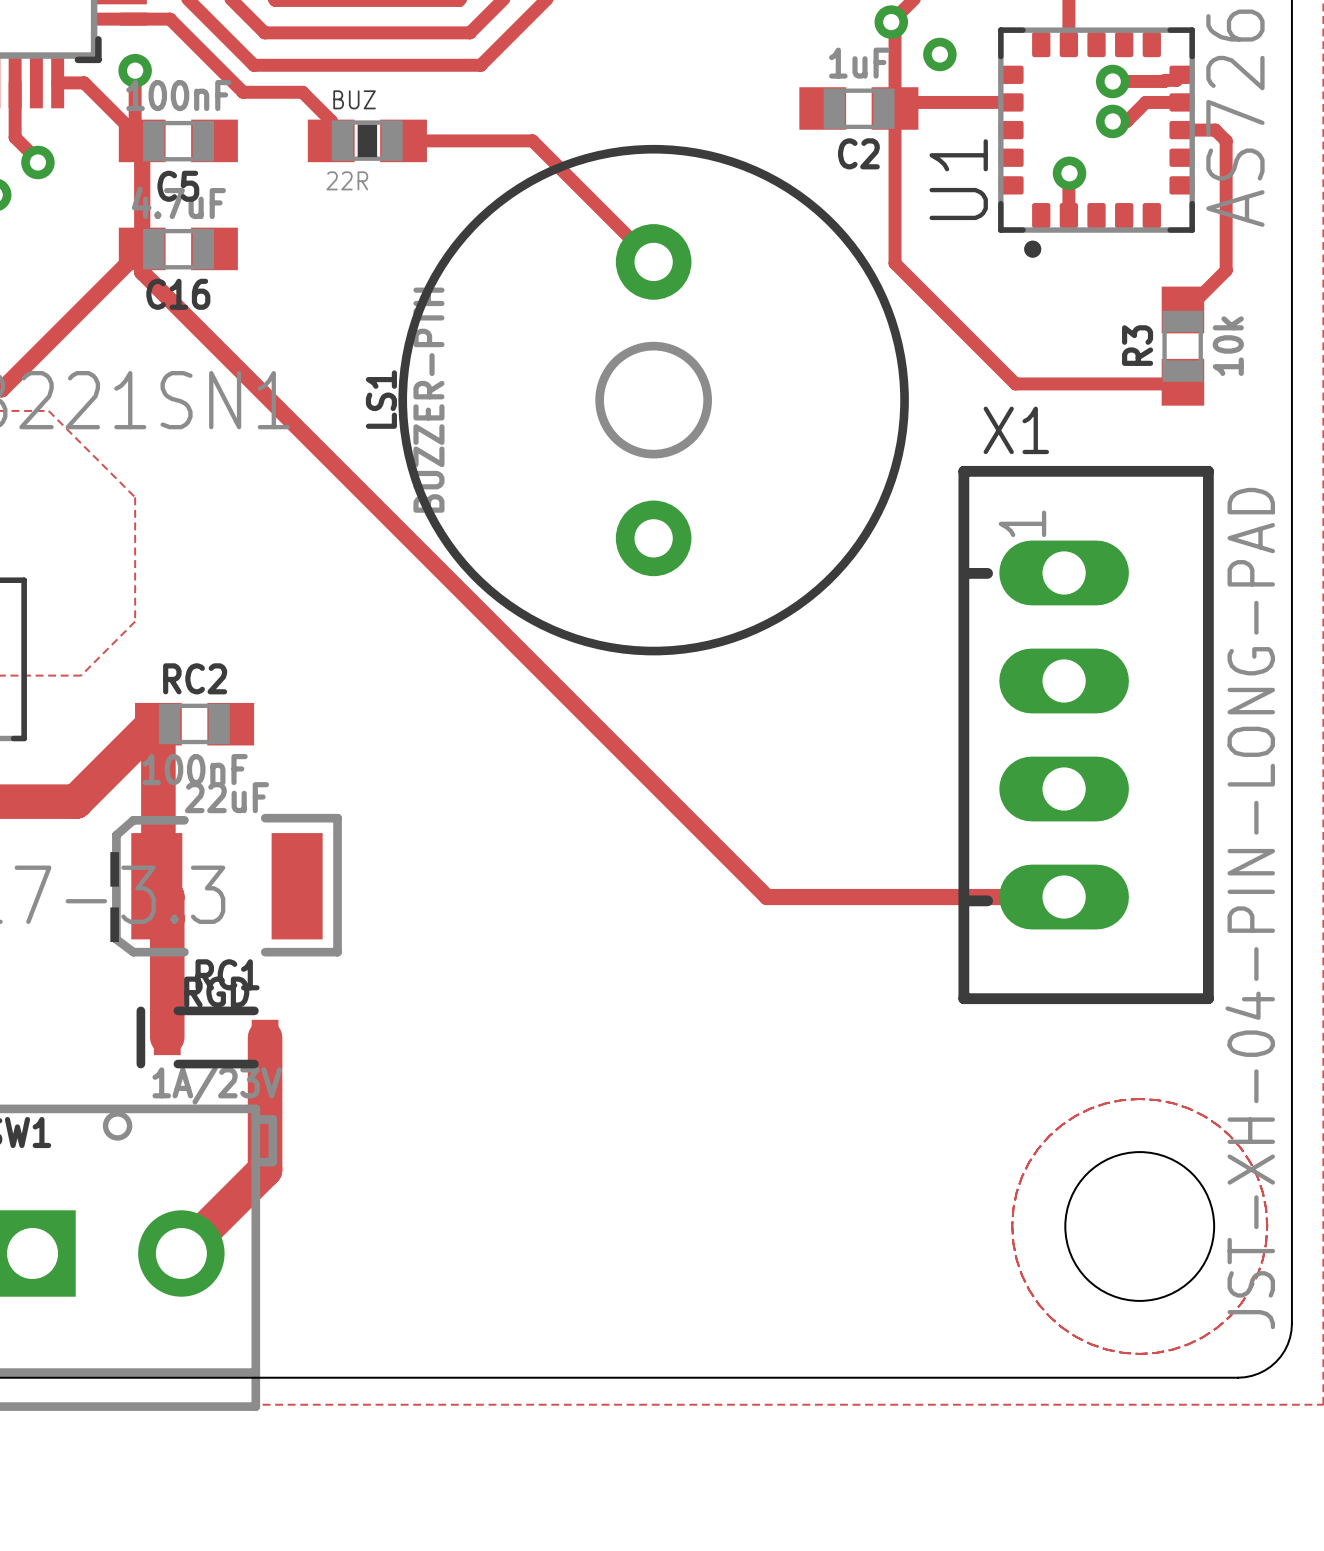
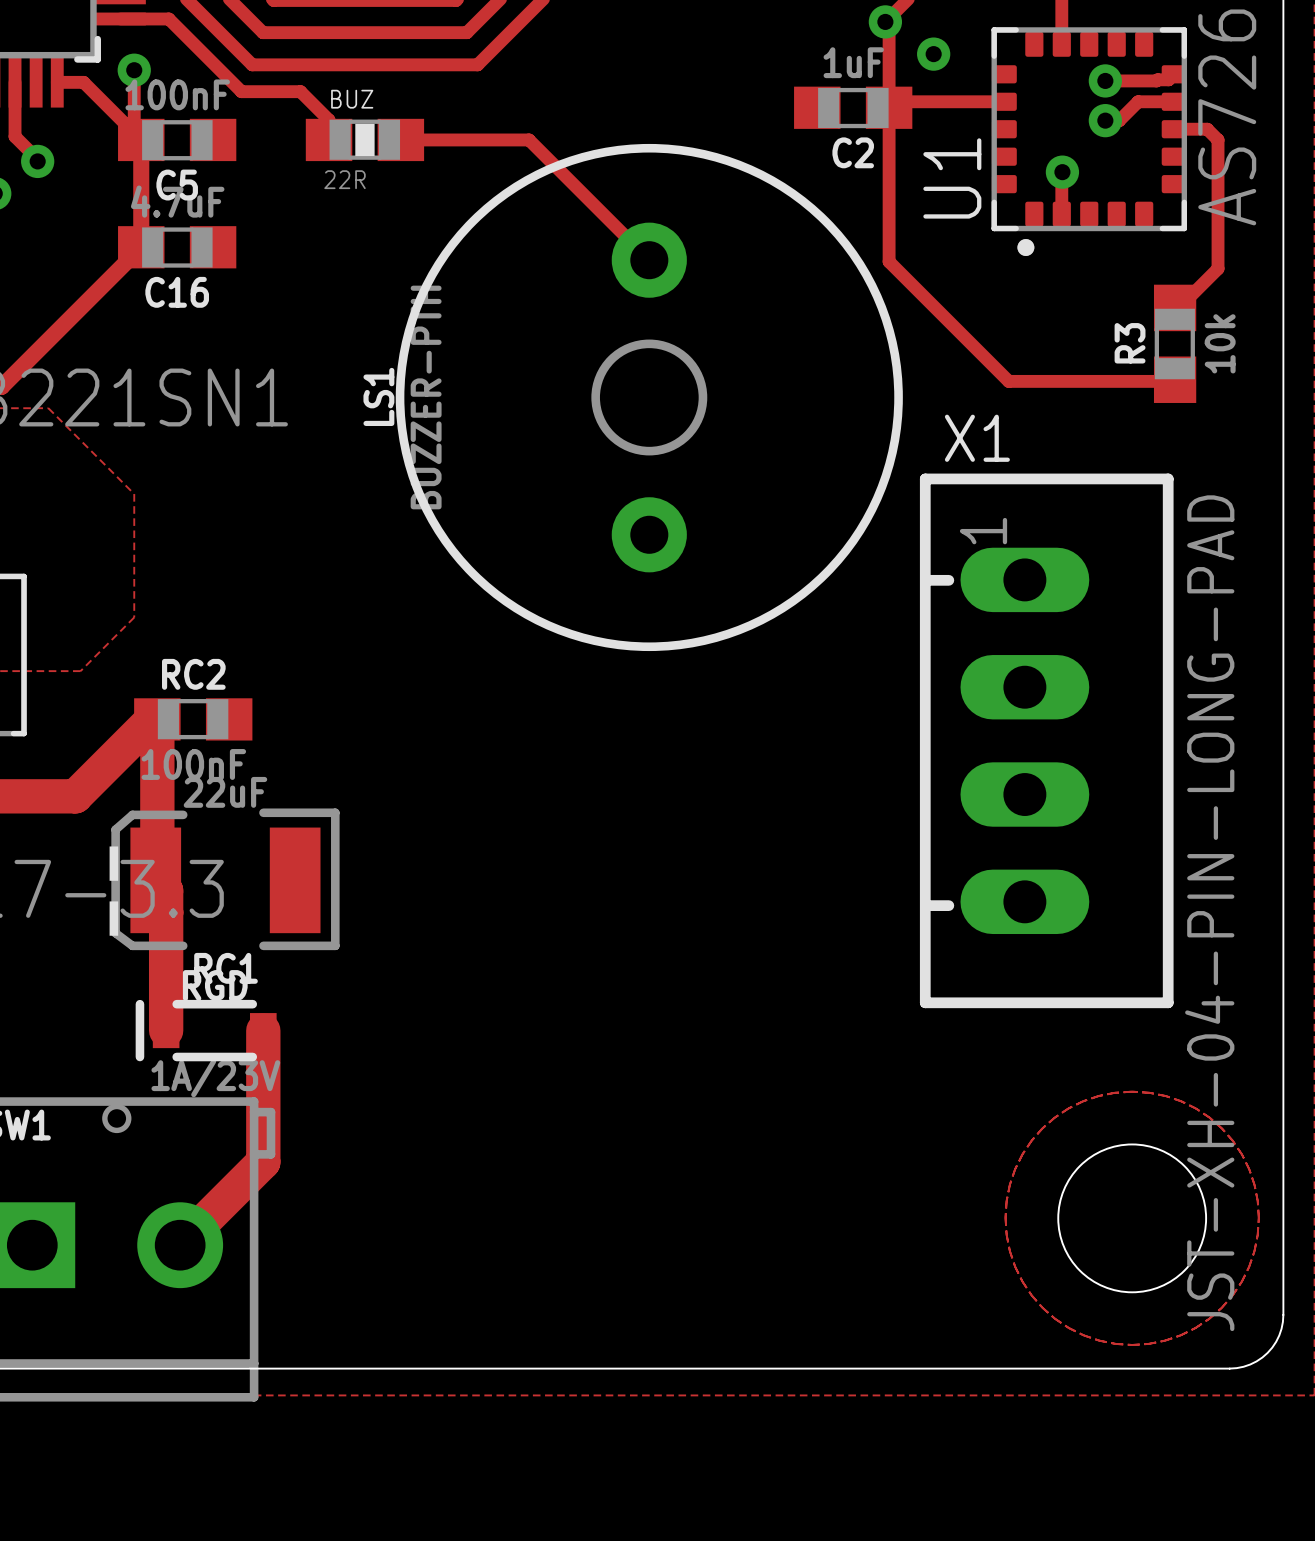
track: (142, 248) (142, 272) (767, 897) (1064, 897) -> none
X1 position: (1086, 735) -> (1046, 740)

